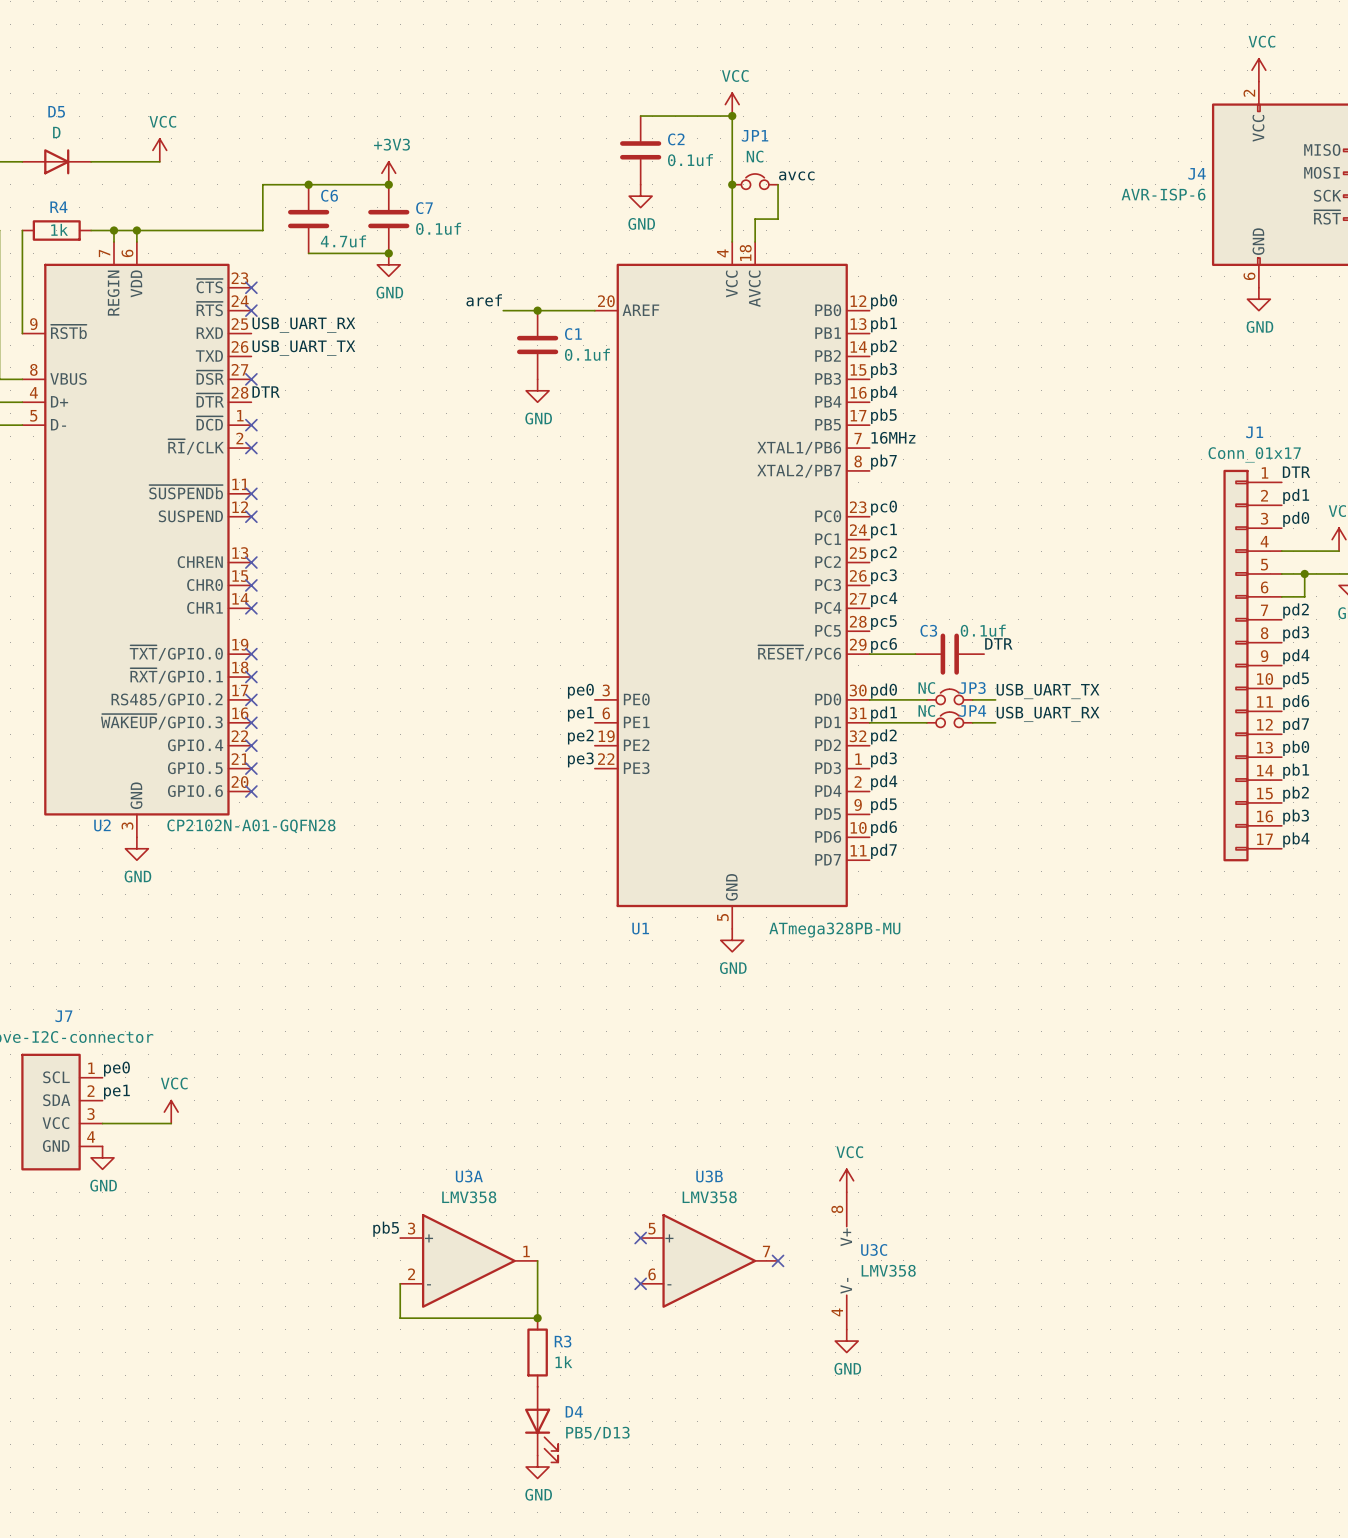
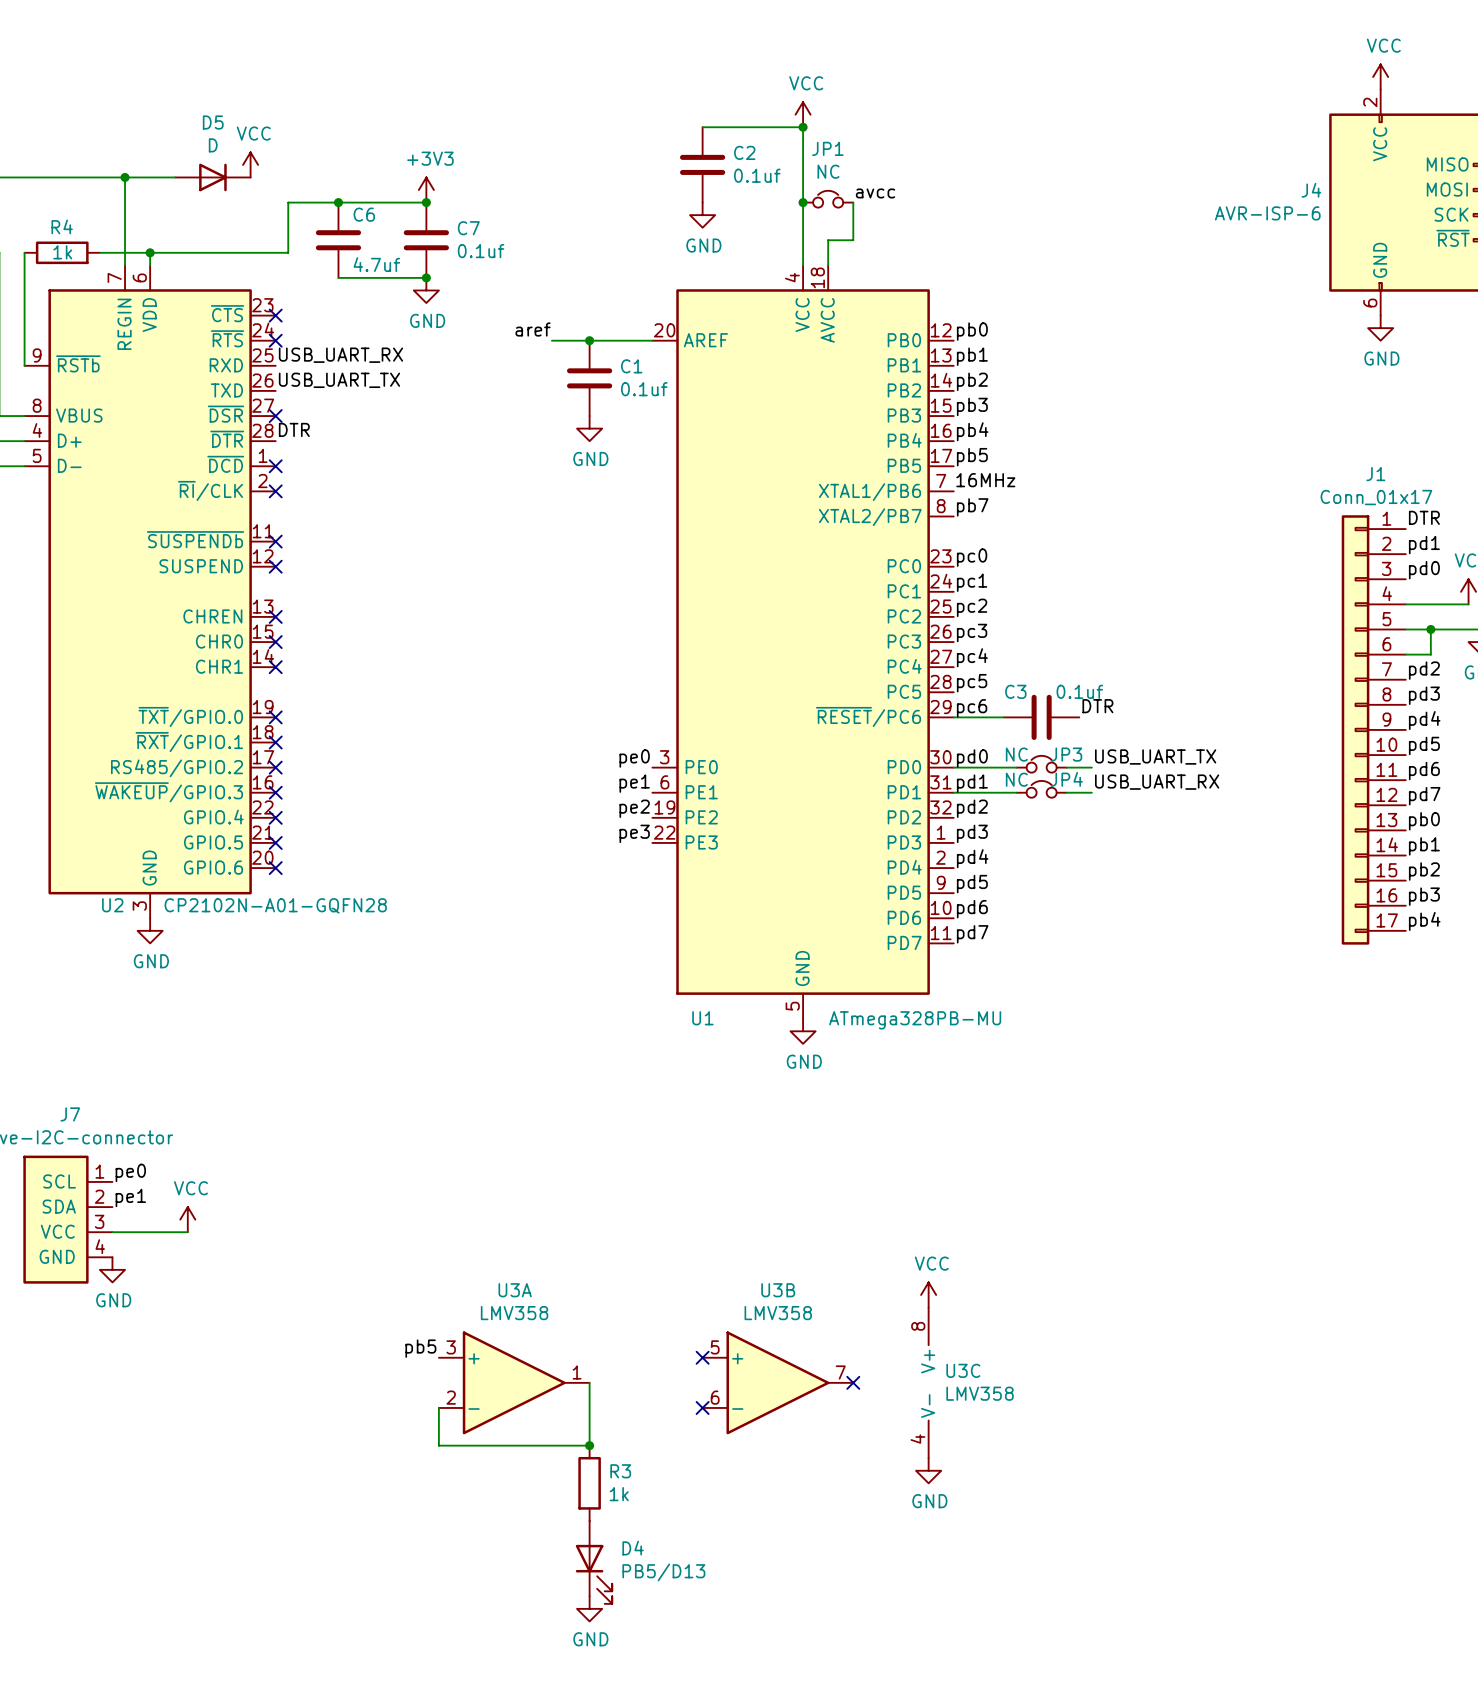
power symbol position: VCC (159, 150) -> VCC (250, 164)
D5 position: (56, 161) -> (212, 177)
wire: none -> (125, 177) (125, 252)
junction: none -> (125, 177)
junction: (114, 230) -> none

